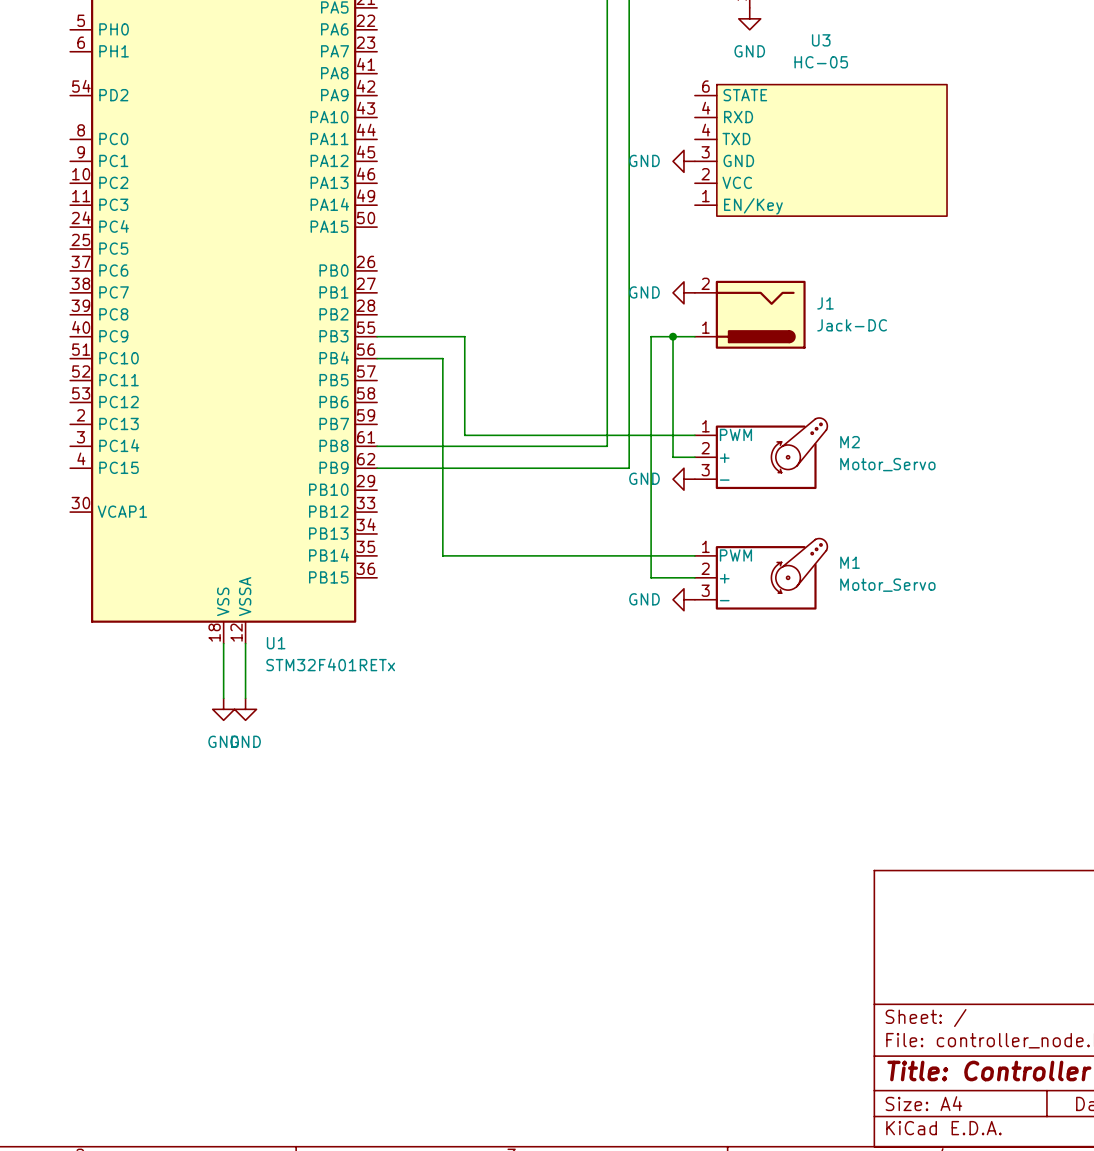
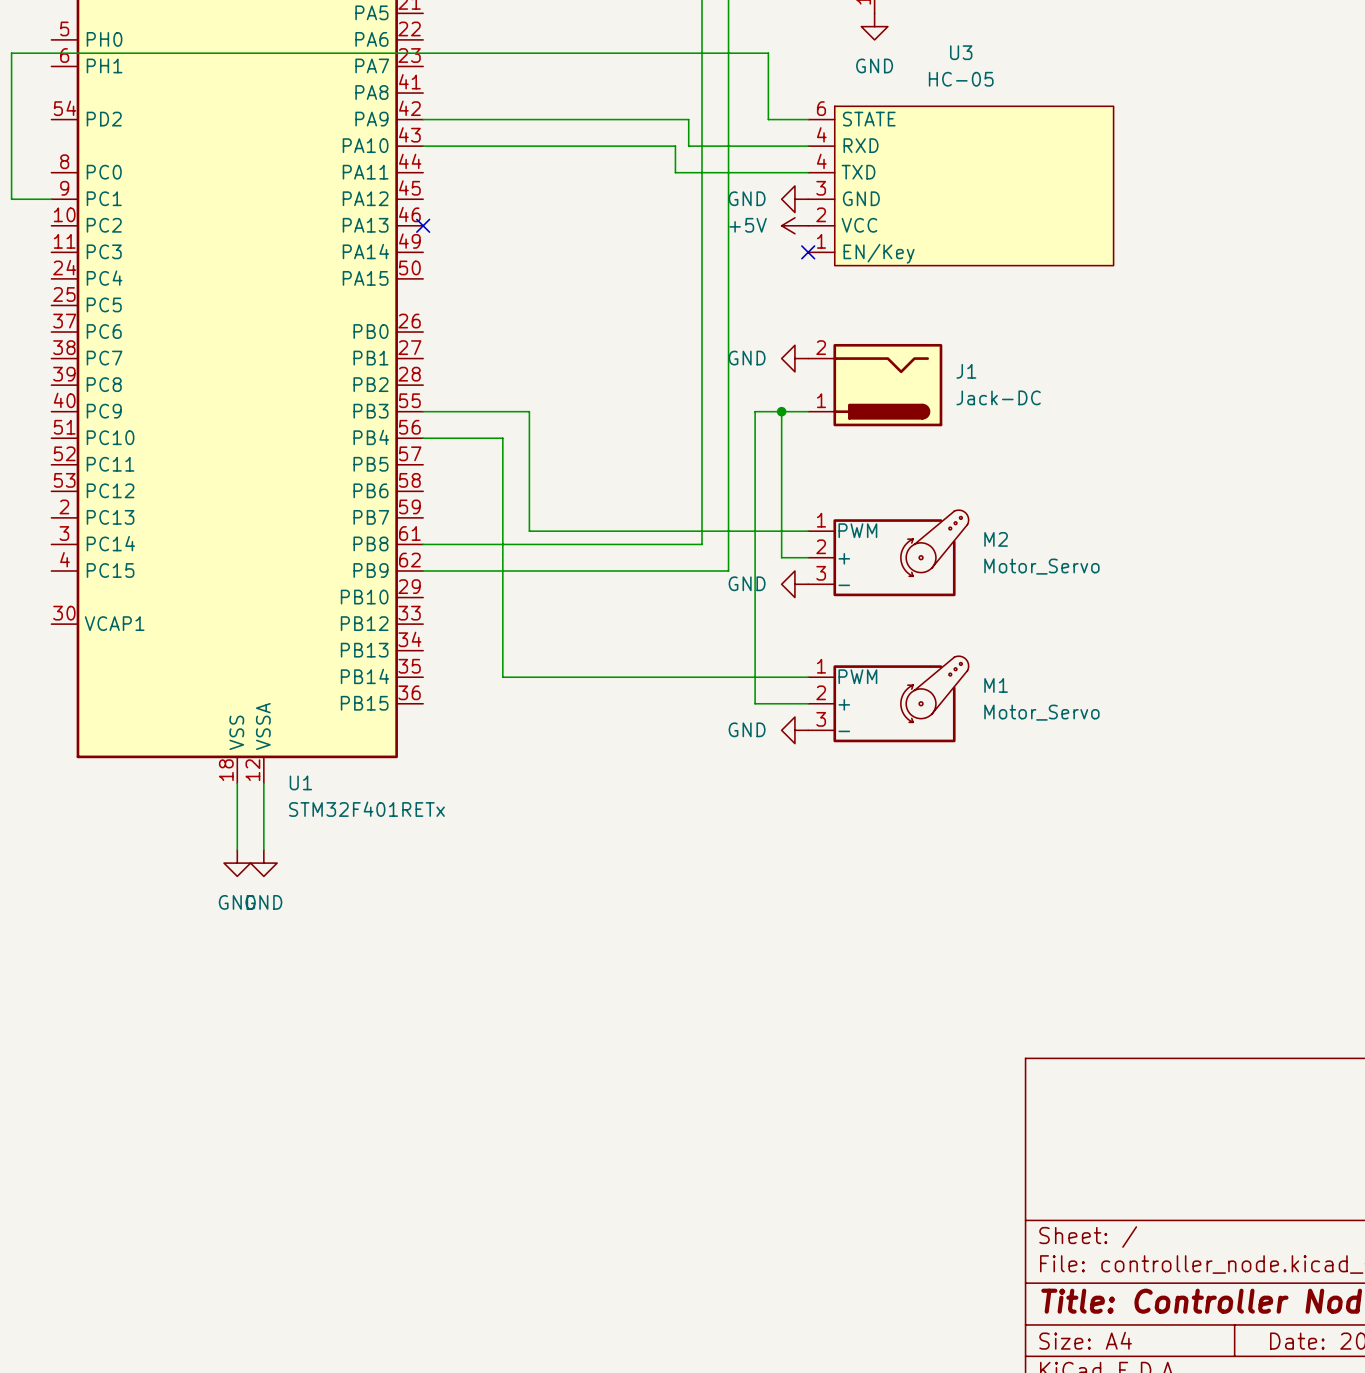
wire: none -> (423, 119) (688, 119) (688, 146) (808, 146)
wire: none -> (808, 119) (768, 119) (768, 53) (11, 53) (11, 199) (51, 199)
wire: none -> (423, 146) (675, 146) (675, 172) (808, 172)
no-connect mark: none -> (423, 225)
power symbol: none -> +5V (794, 225)
no-connect mark: none -> (808, 252)

